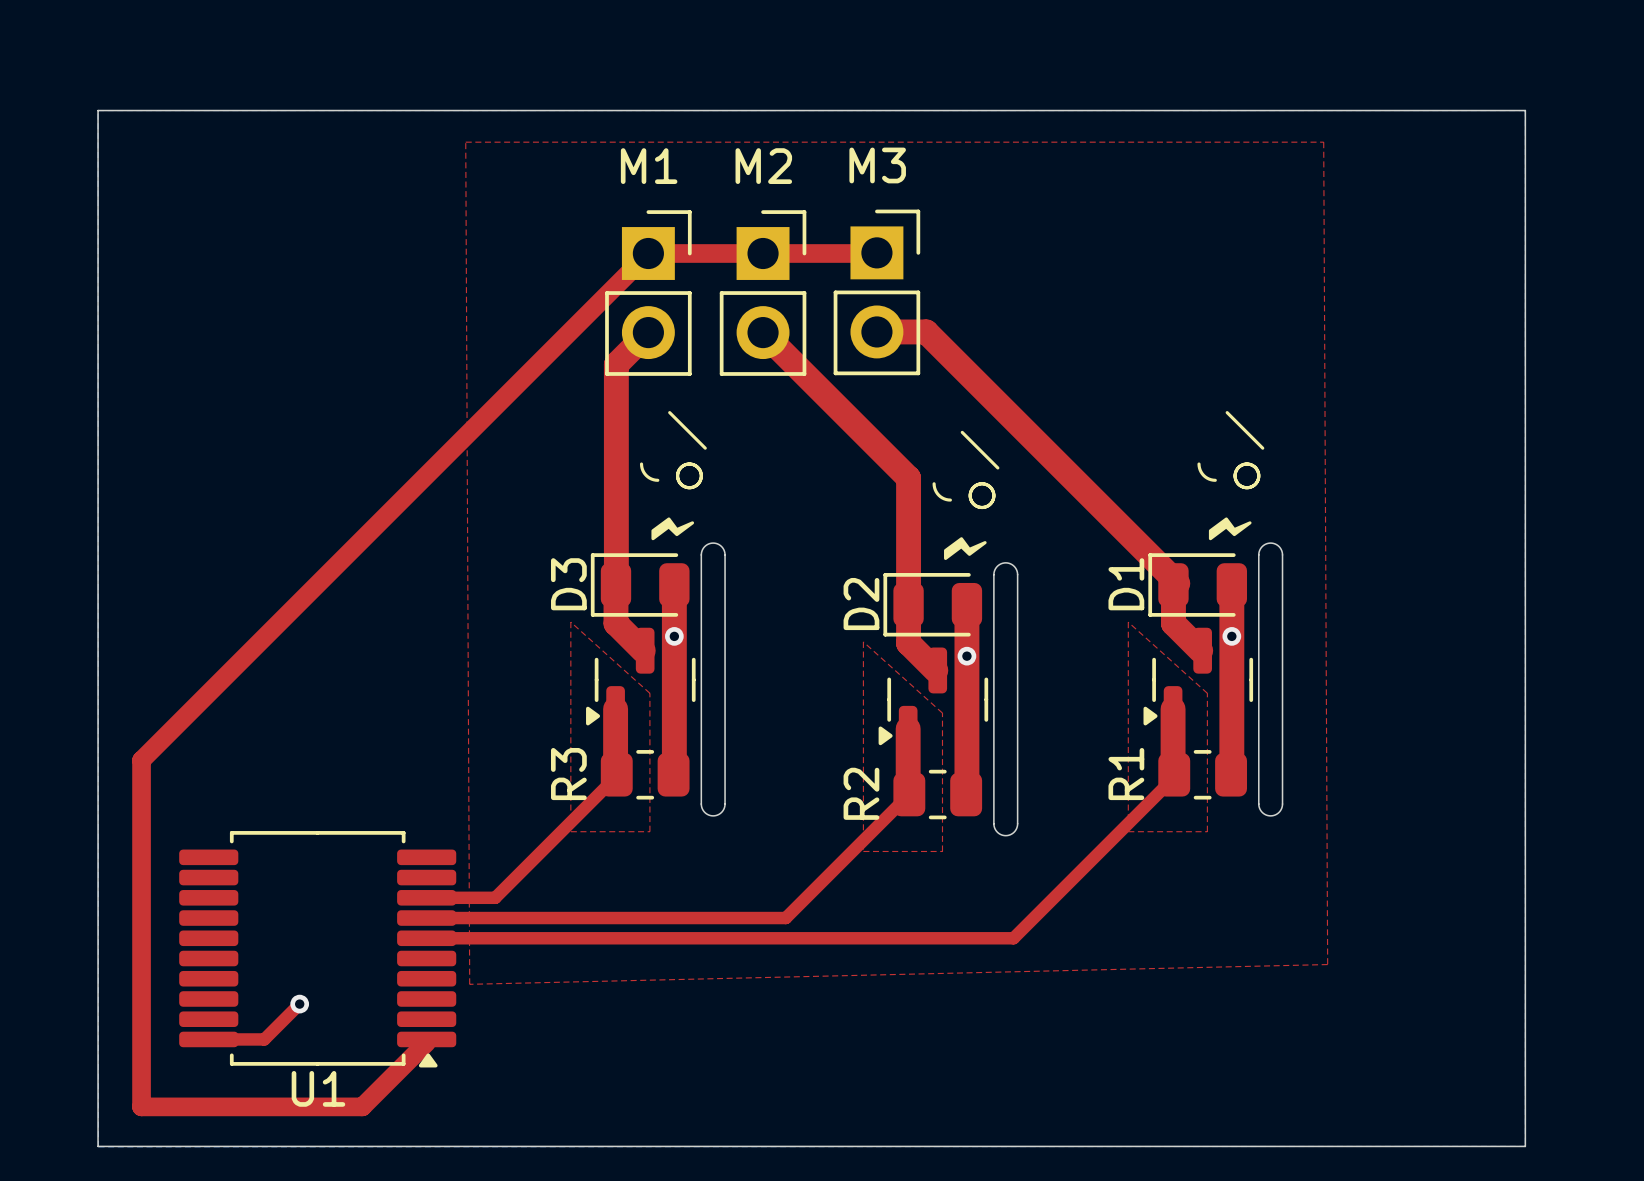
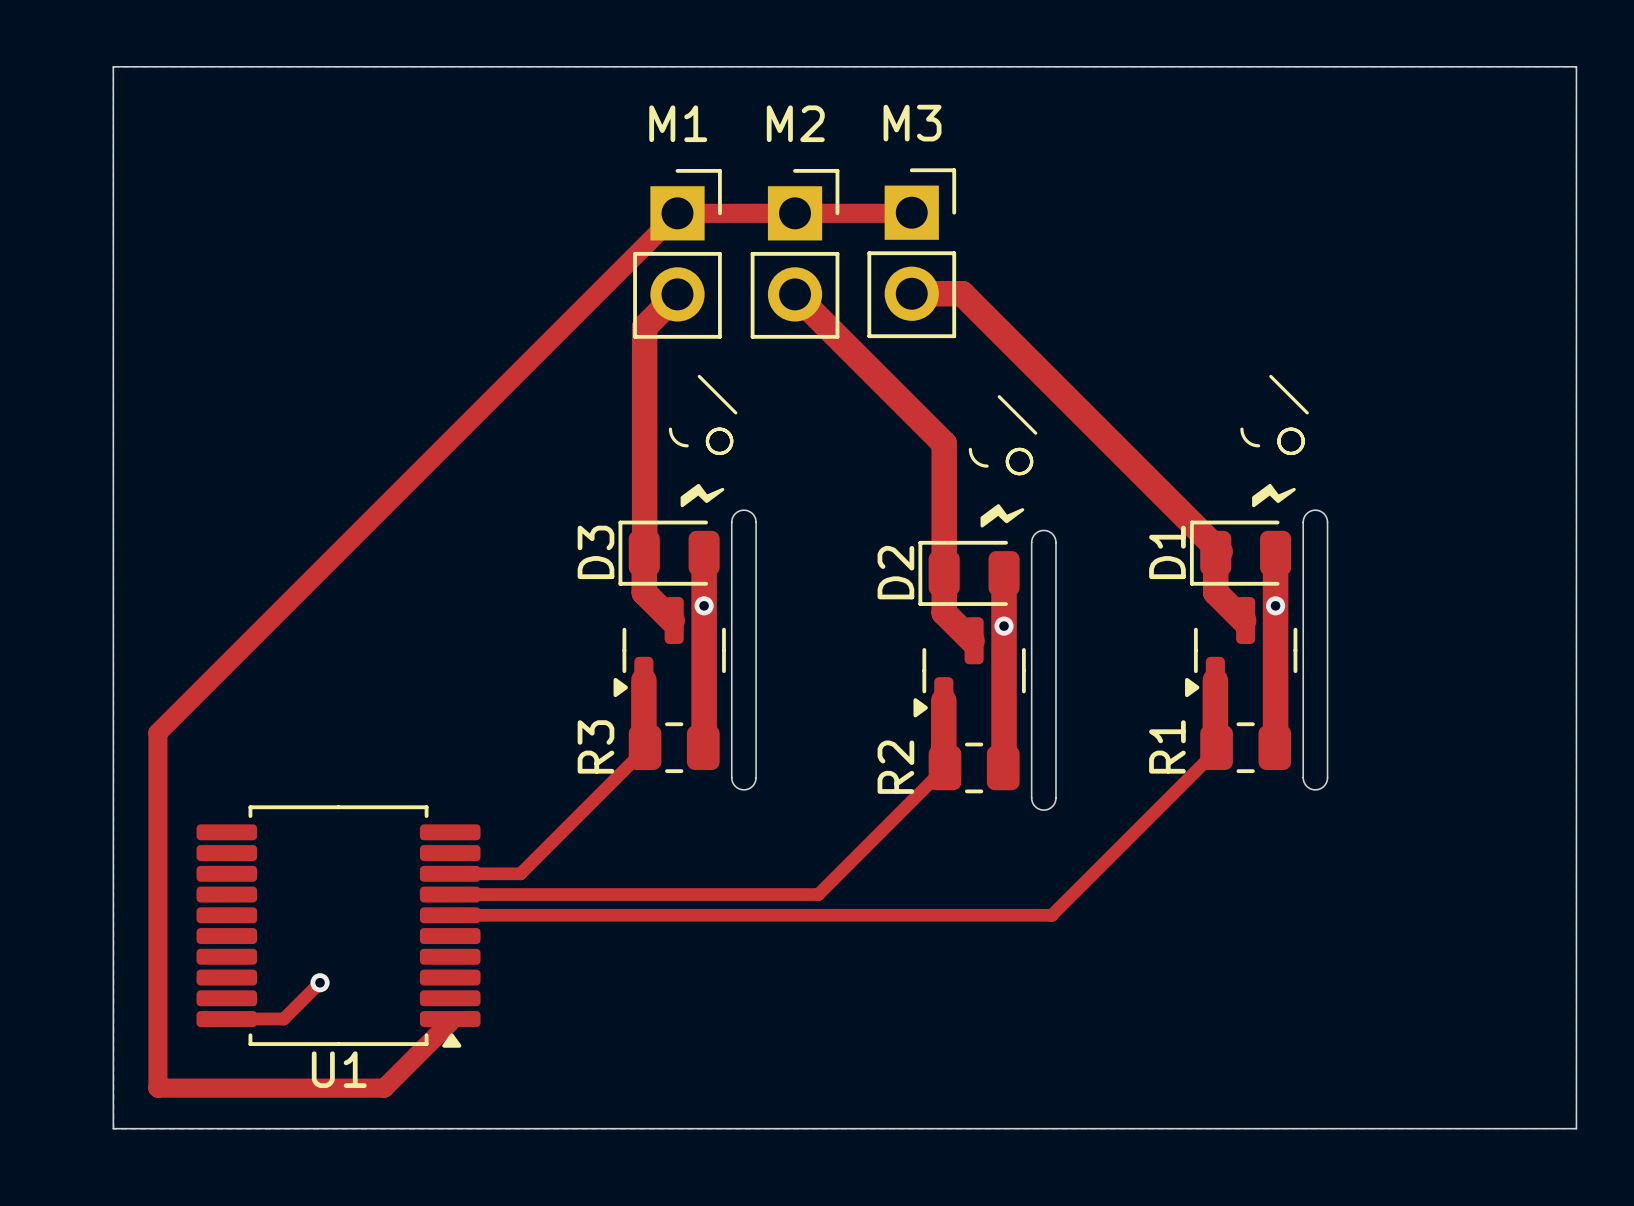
top zone outline: (465, 142) (469, 984) (1327, 964) (1323, 142) (465, 142) -> none
top zone outline: (570, 622) (649, 693) (649, 831) (570, 831) (570, 622) -> none
top zone outline: (1128, 622) (1207, 693) (1207, 831) (1128, 831) (1128, 622) -> none
top zone outline: (863, 641) (942, 713) (942, 851) (863, 851) (863, 641) -> none

